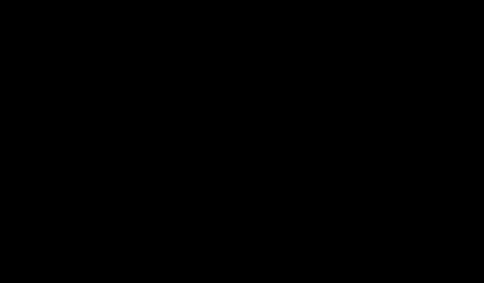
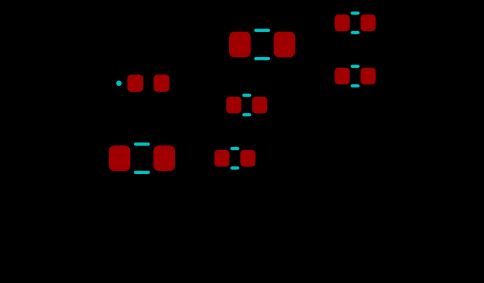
part: none -> (355, 22)
part: none -> (262, 44)
part: none -> (355, 76)
part: none -> (142, 83)
part: none -> (246, 105)
part: none -> (141, 158)
part: none -> (234, 158)

